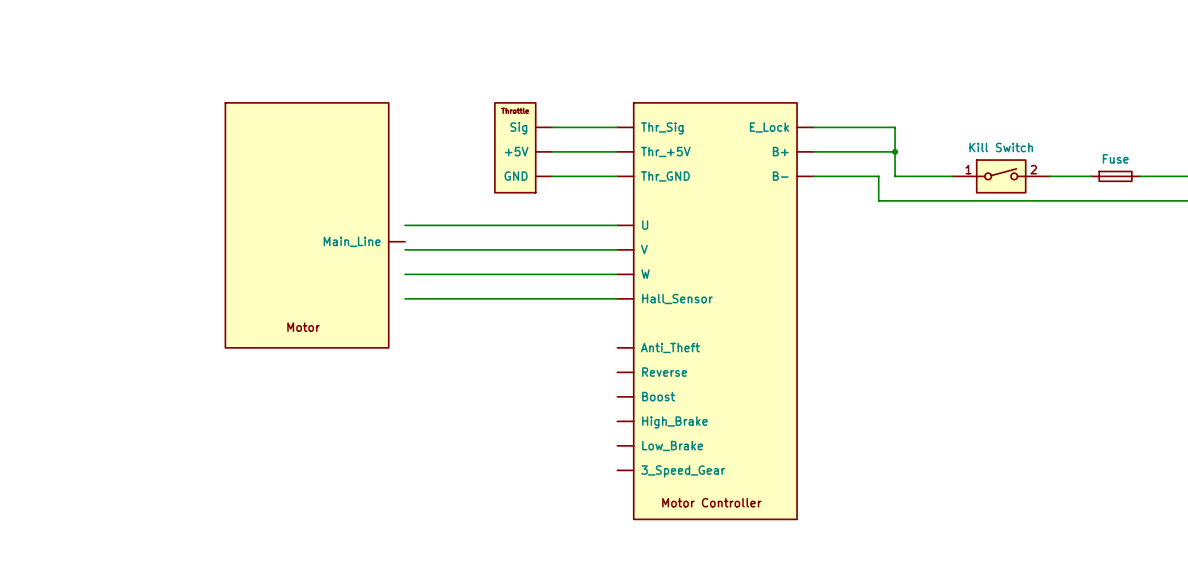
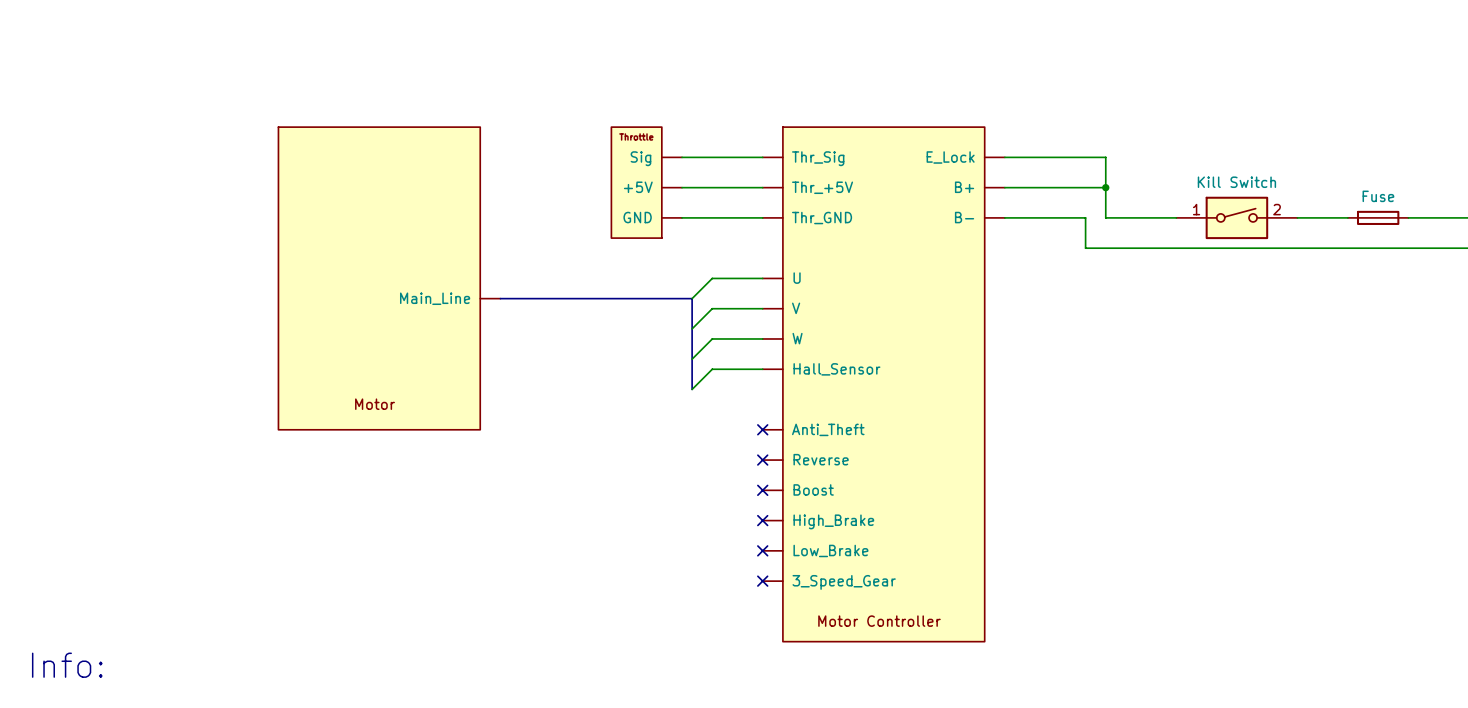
wire: (405, 225) (576, 225) -> (692, 298) (712, 278)
bus: none -> (500, 298) (692, 298) (692, 389)
wire: (405, 249) (576, 249) -> (692, 328) (712, 308)
wire: (405, 274) (576, 274) -> (692, 359) (712, 338)
wire: (405, 298) (576, 298) -> (692, 389) (712, 369)
no-connect mark: none -> (762, 429)
no-connect mark: none -> (762, 460)
no-connect mark: none -> (762, 490)
no-connect mark: none -> (762, 520)
no-connect mark: none -> (762, 550)
no-connect mark: none -> (762, 581)
text: none -> Info: (67, 665)

